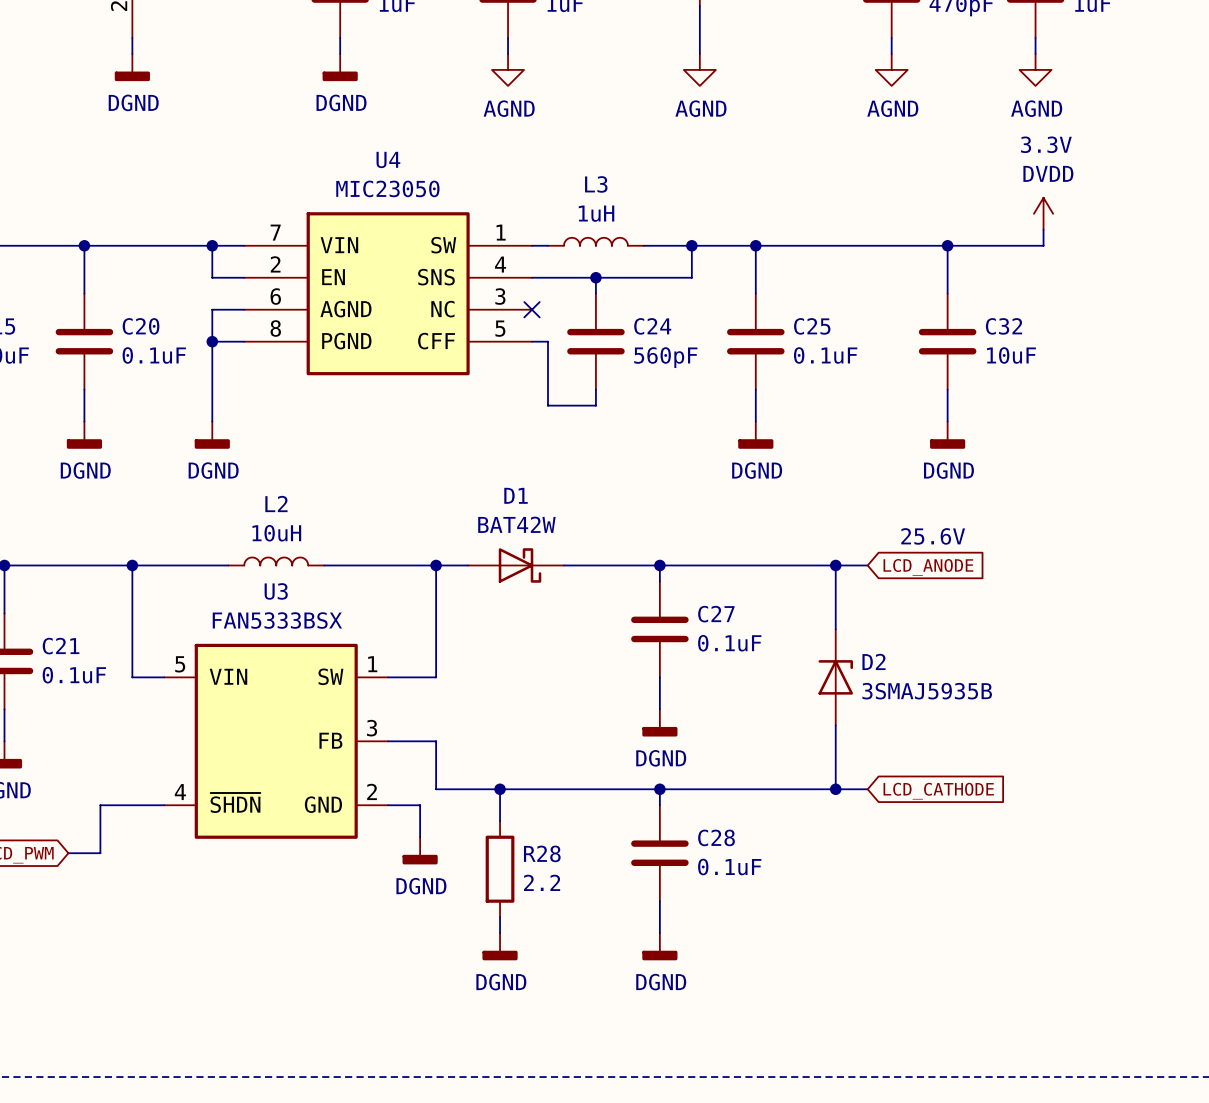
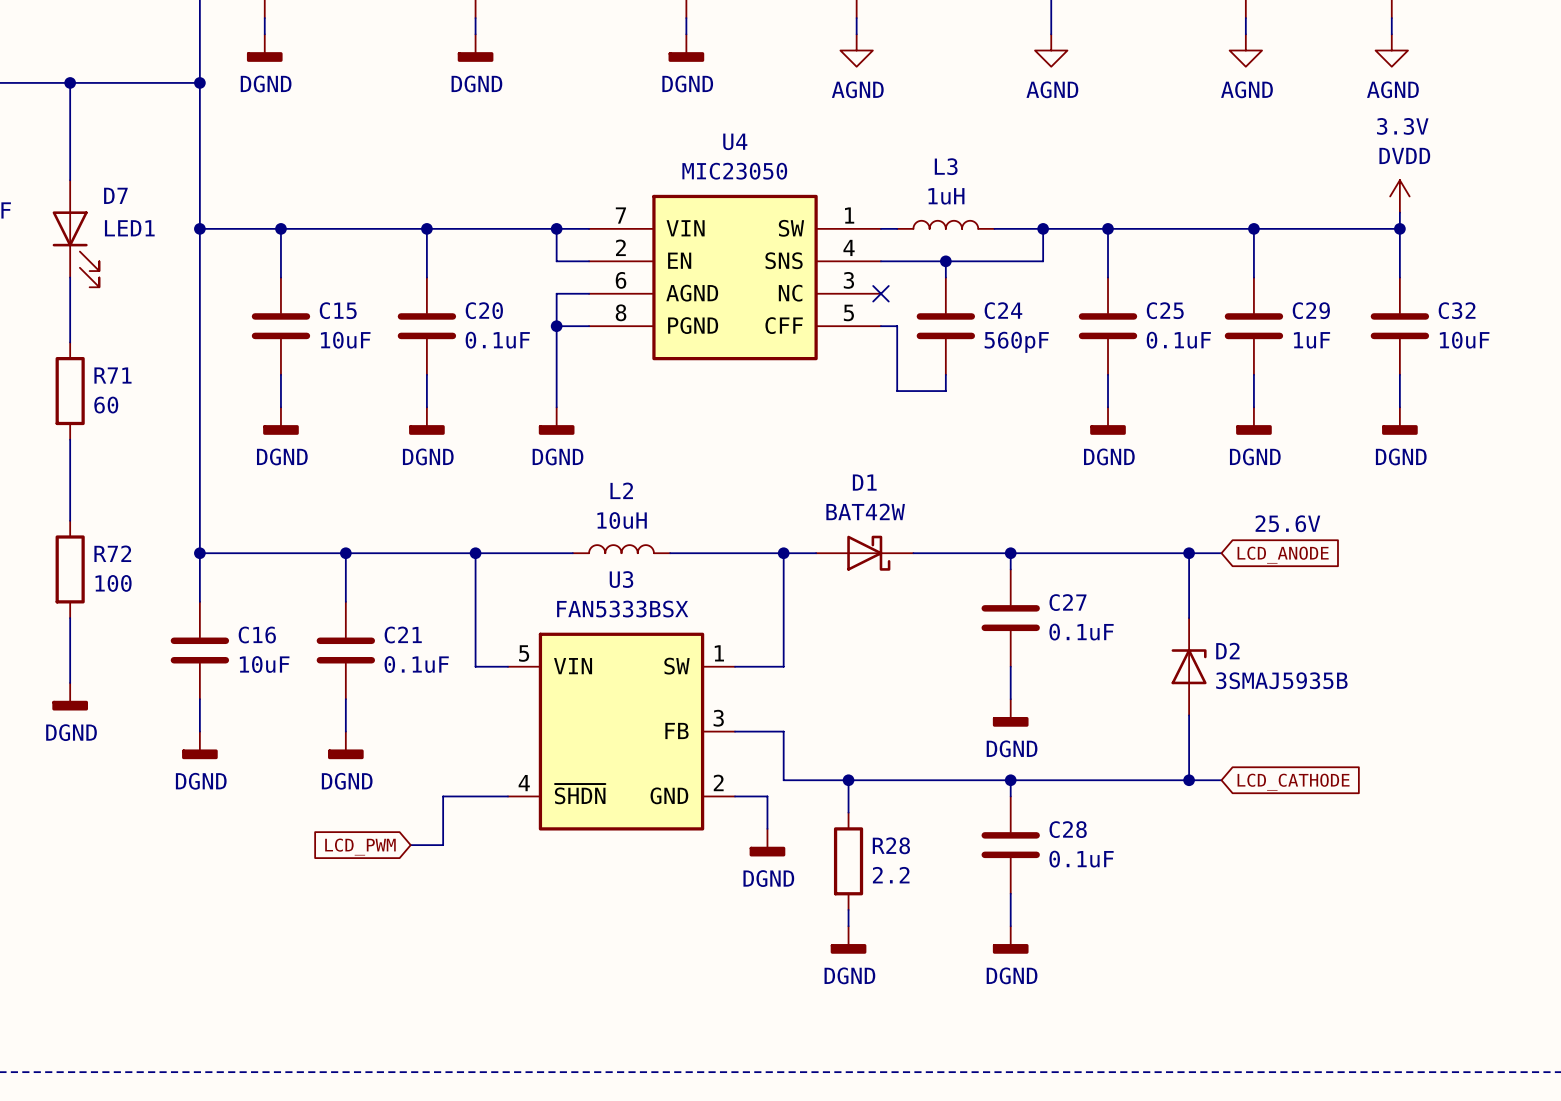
junction: none -> (1253, 228)
wire: (947, 245) (947, 293) -> (1253, 228) (1253, 277)
junction: (947, 245) -> none
wire: none -> (1399, 228) (1399, 277)
junction: none -> (1399, 228)
C29: none -> 1uF (1253, 326)
C32 position: (947, 341) -> (1399, 326)
wire: (947, 389) (947, 421) -> (1253, 374) (1253, 407)
wire: none -> (1399, 374) (1399, 407)
power symbol: none -> DGND (1253, 421)
power symbol: DGND (947, 435) -> none
power symbol: none -> DGND (1399, 421)

